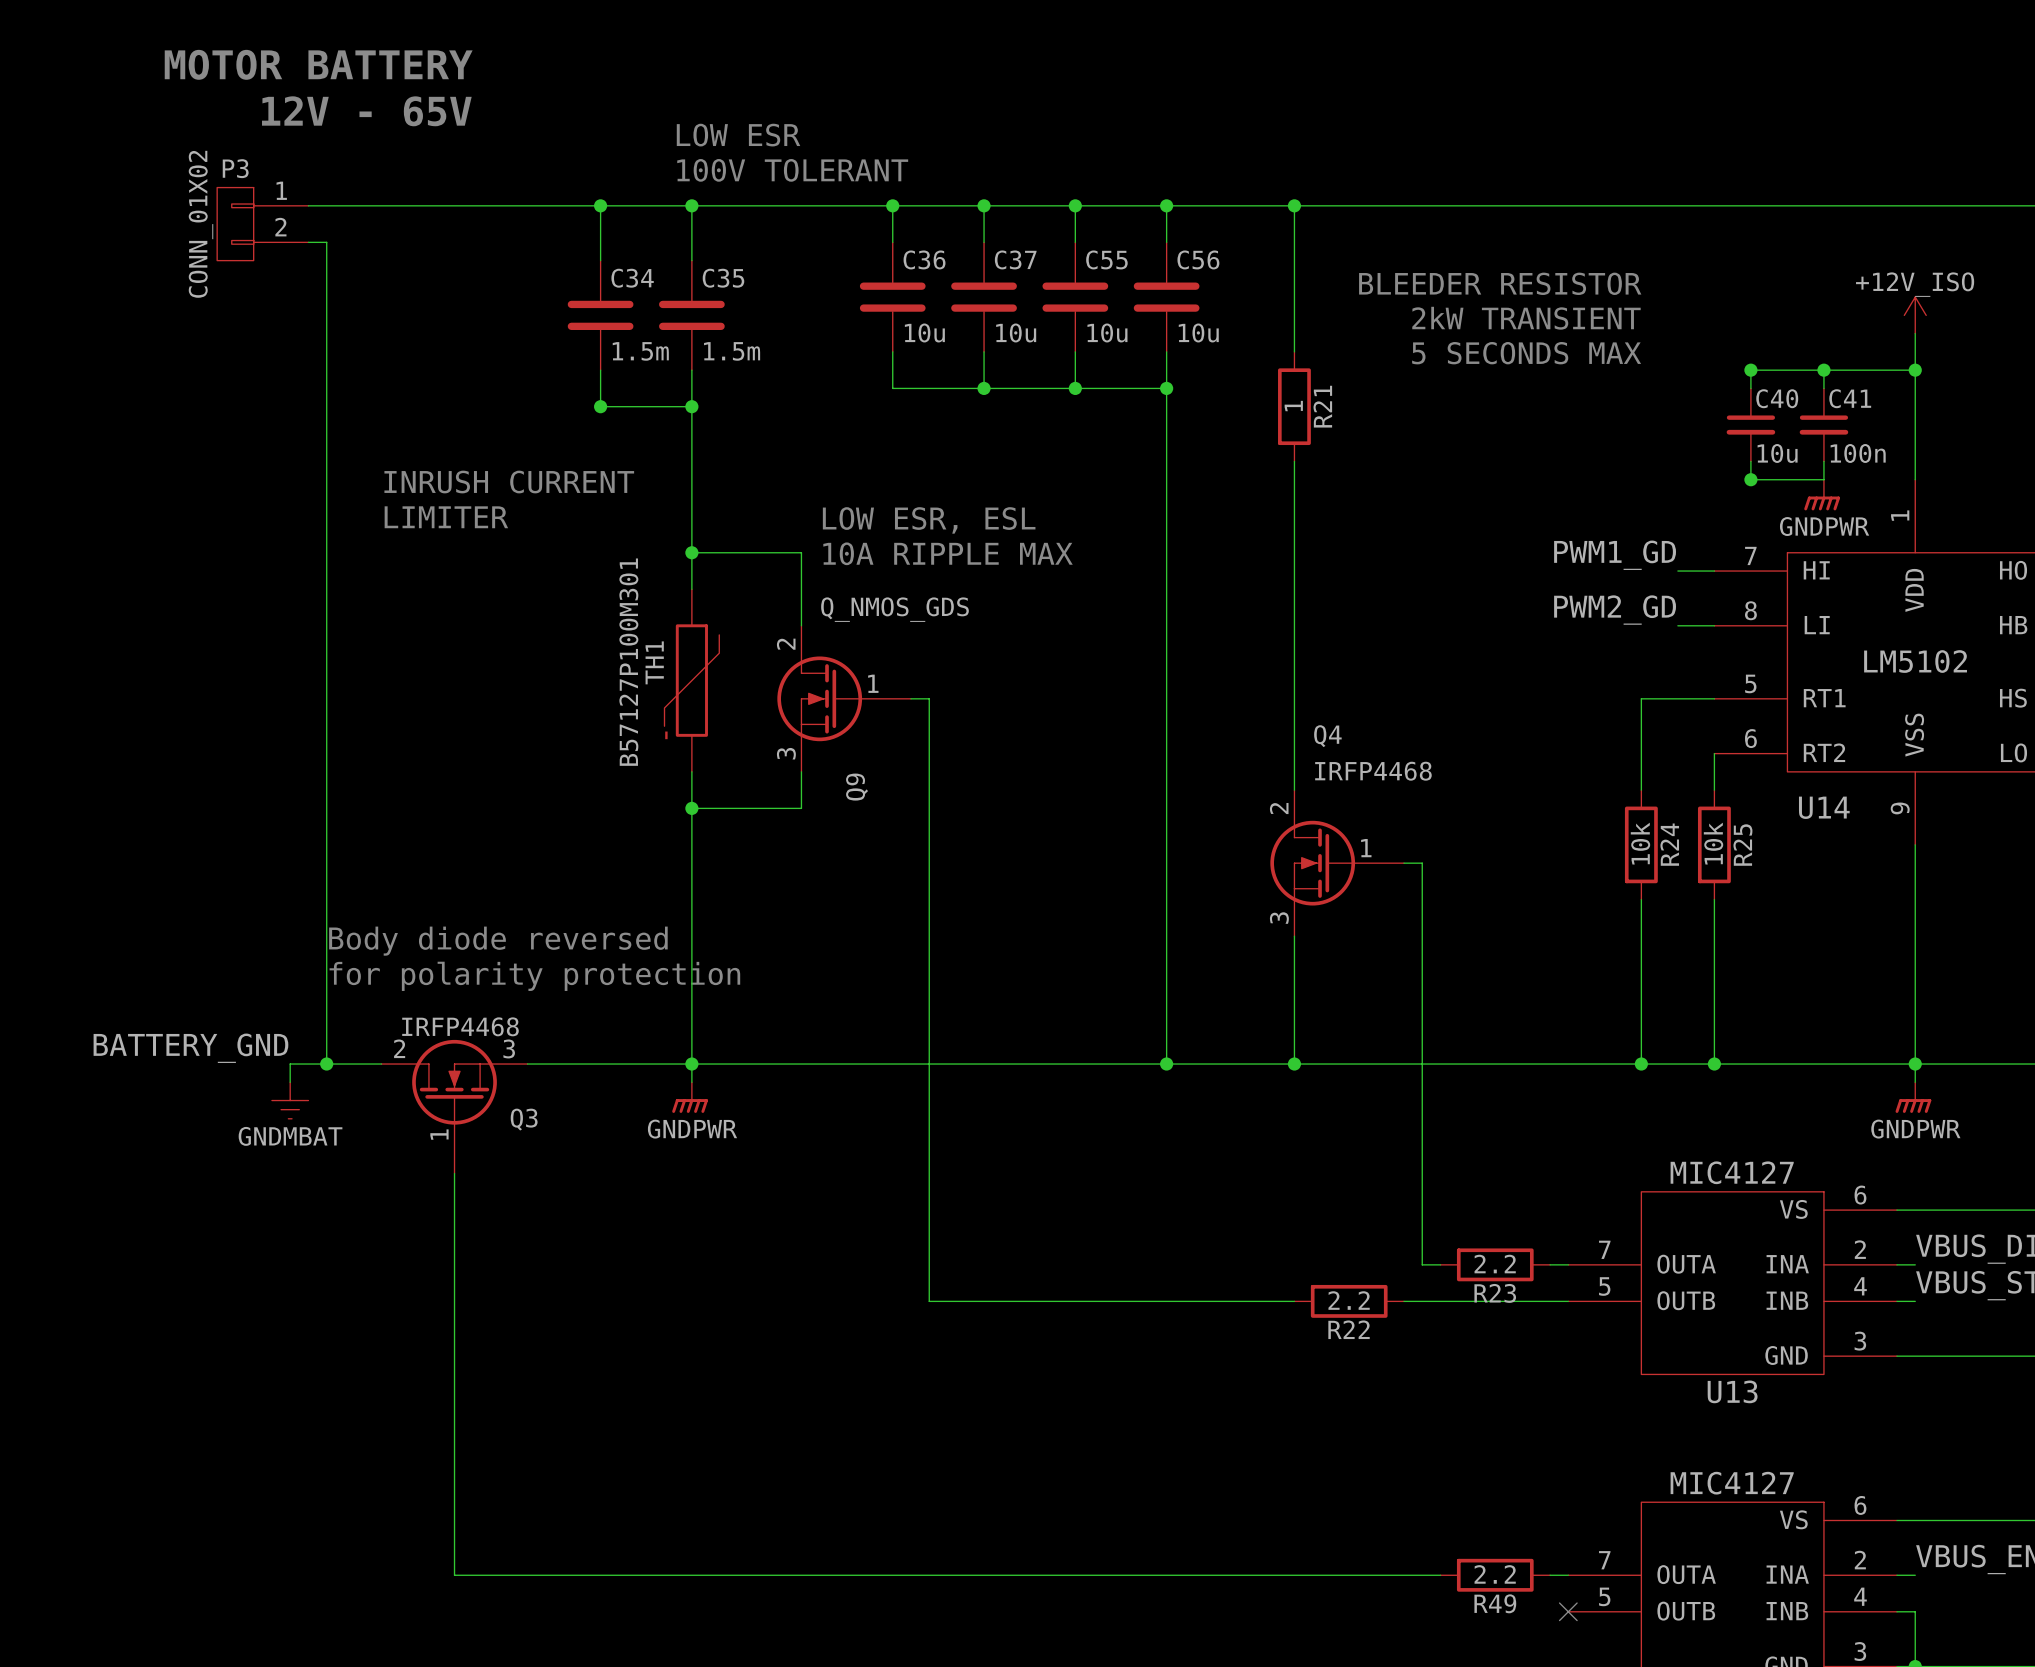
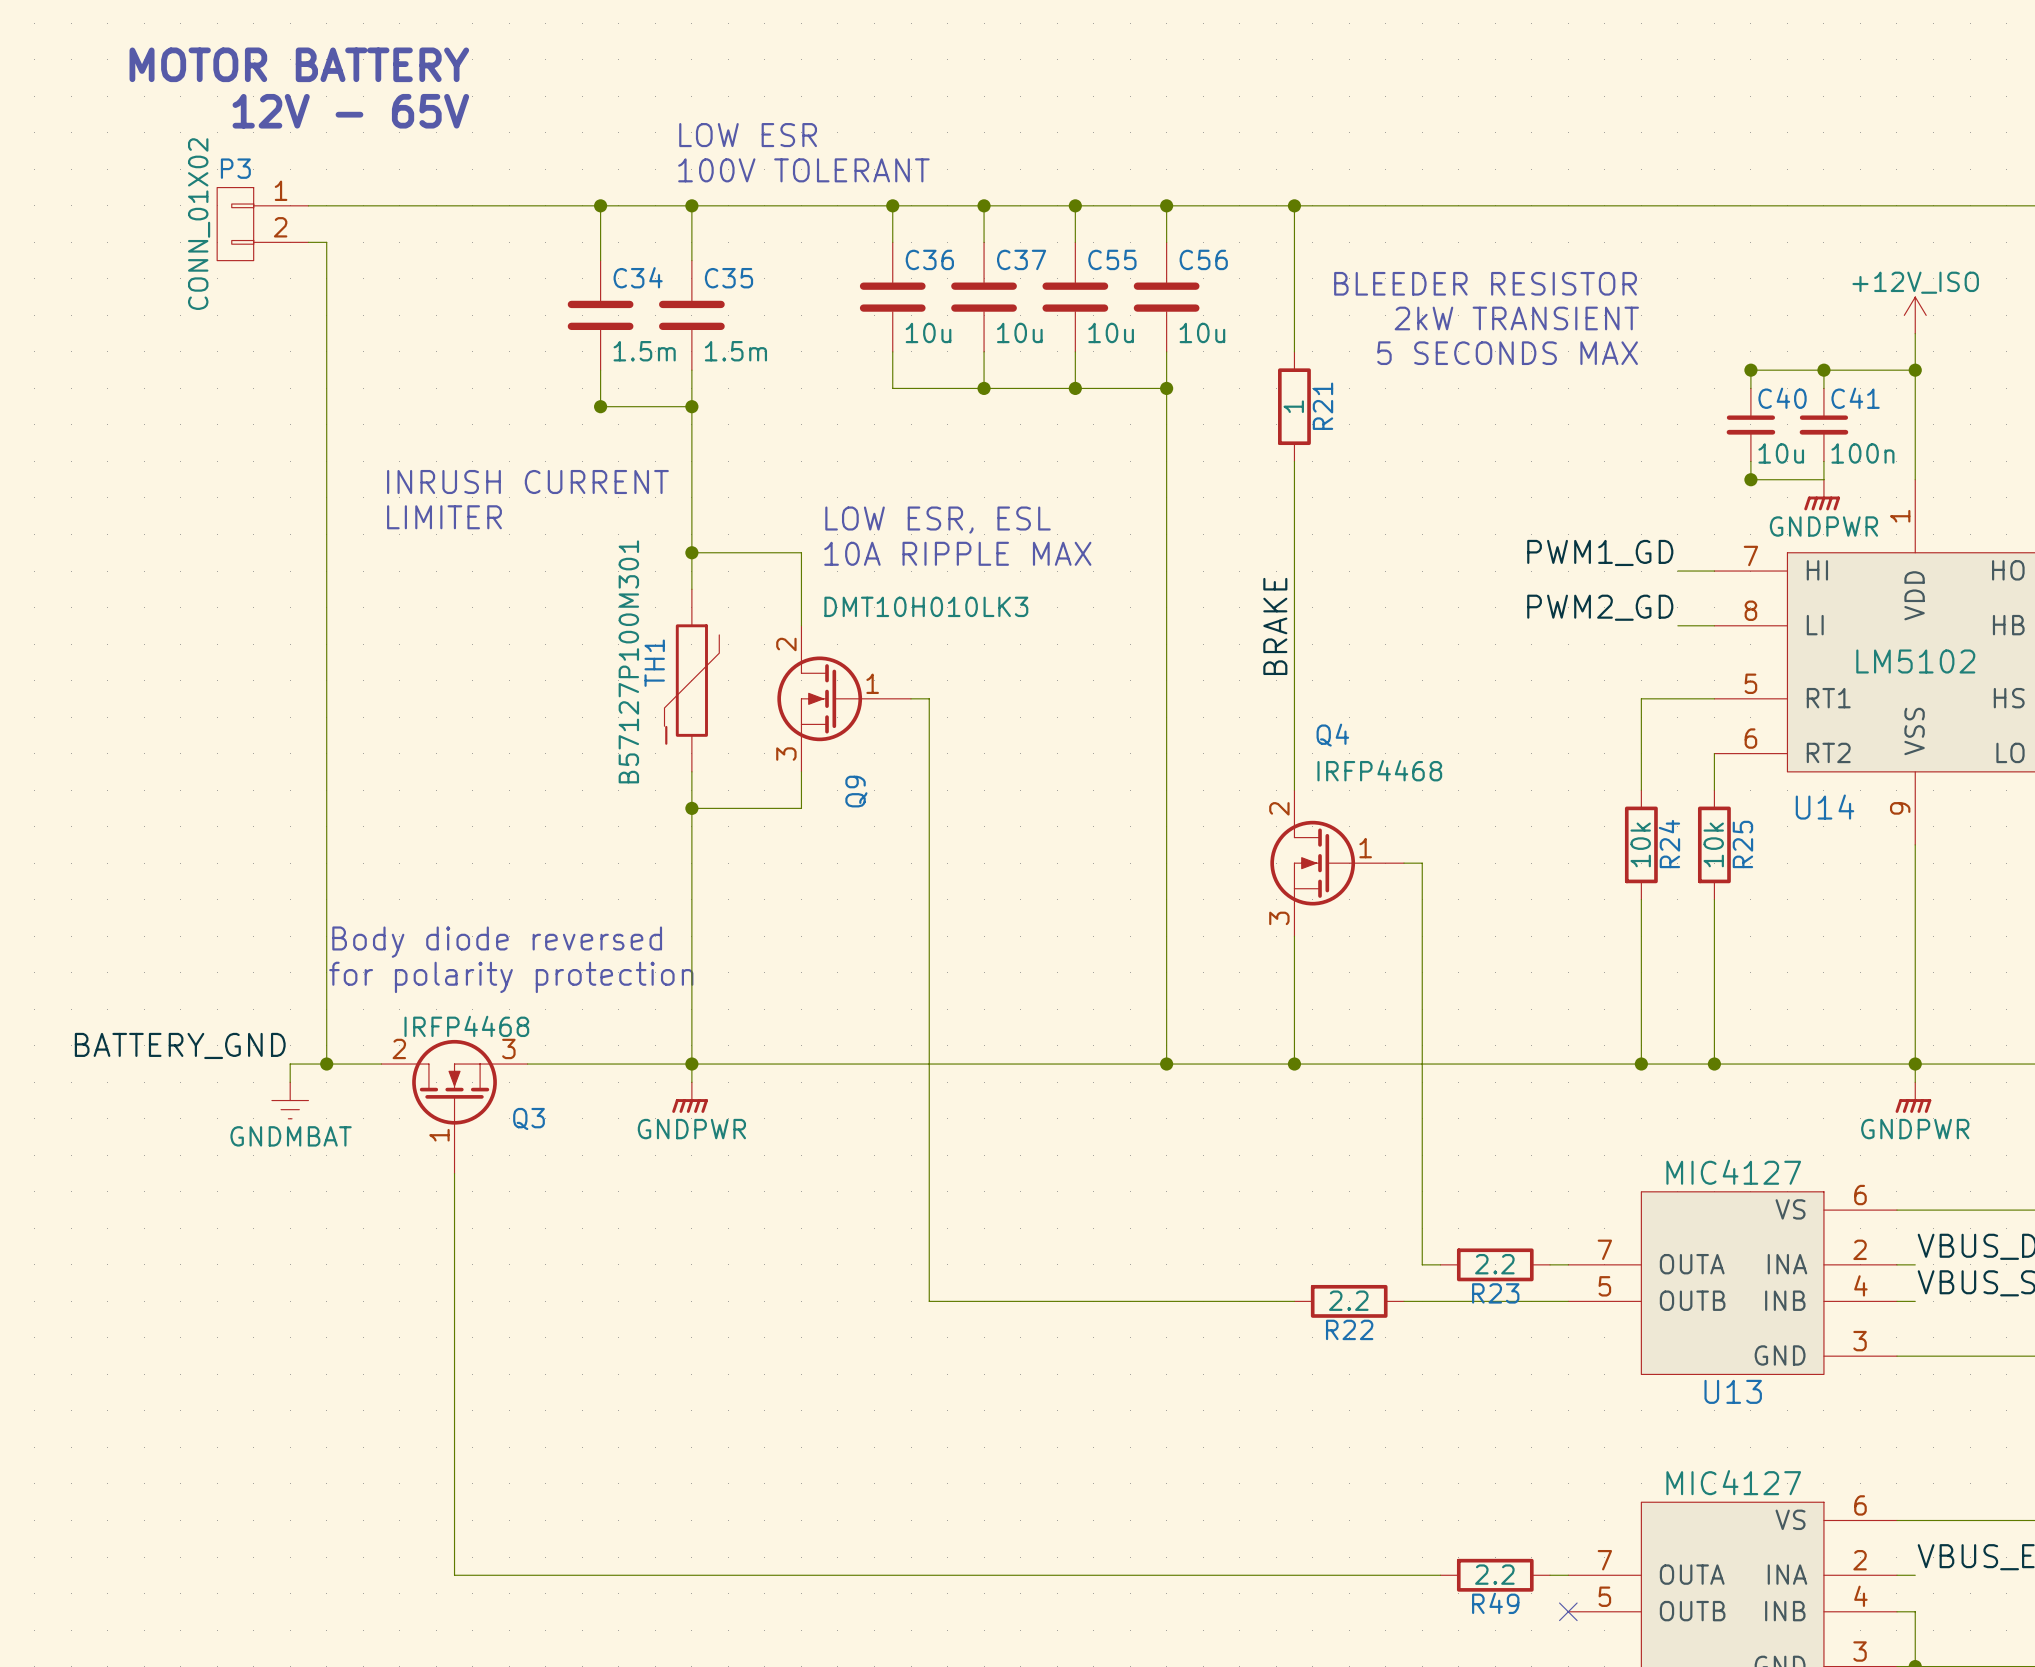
Q9 value: Q_NMOS_GDS (894, 609) -> DMT10H010LK3 (926, 606)
label: none -> BRAKE (1275, 626)

